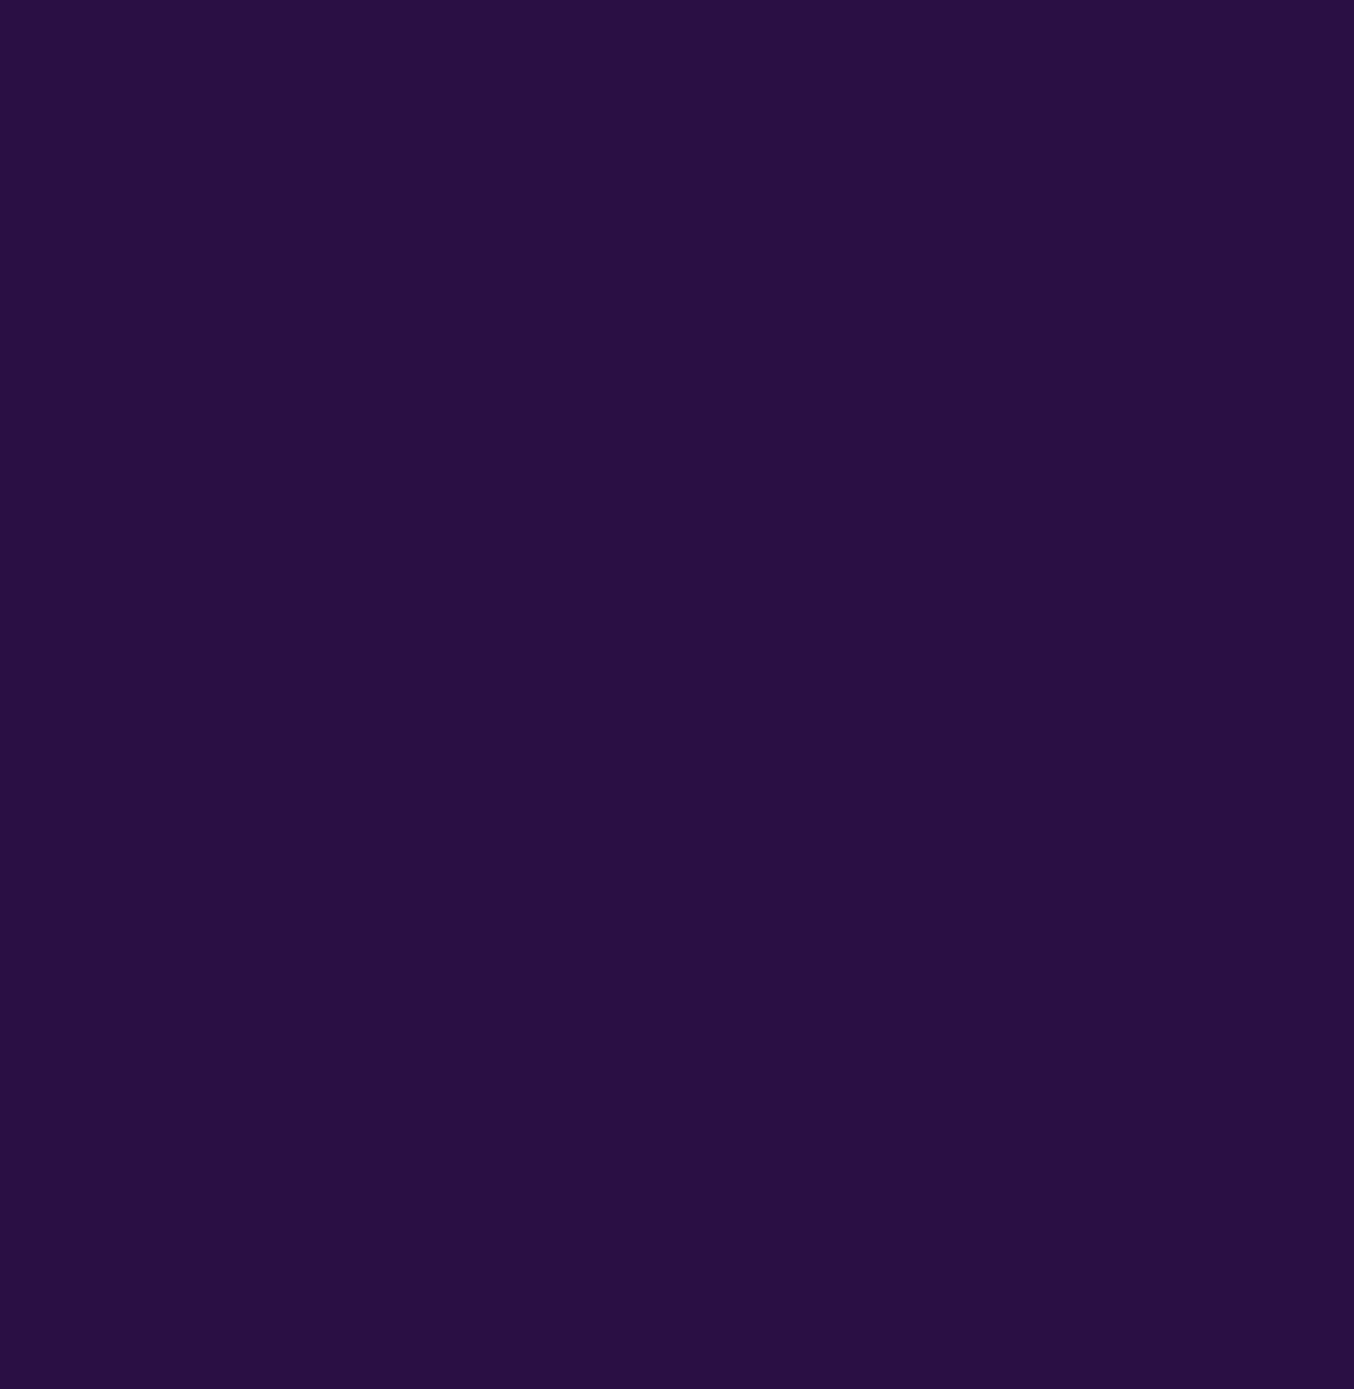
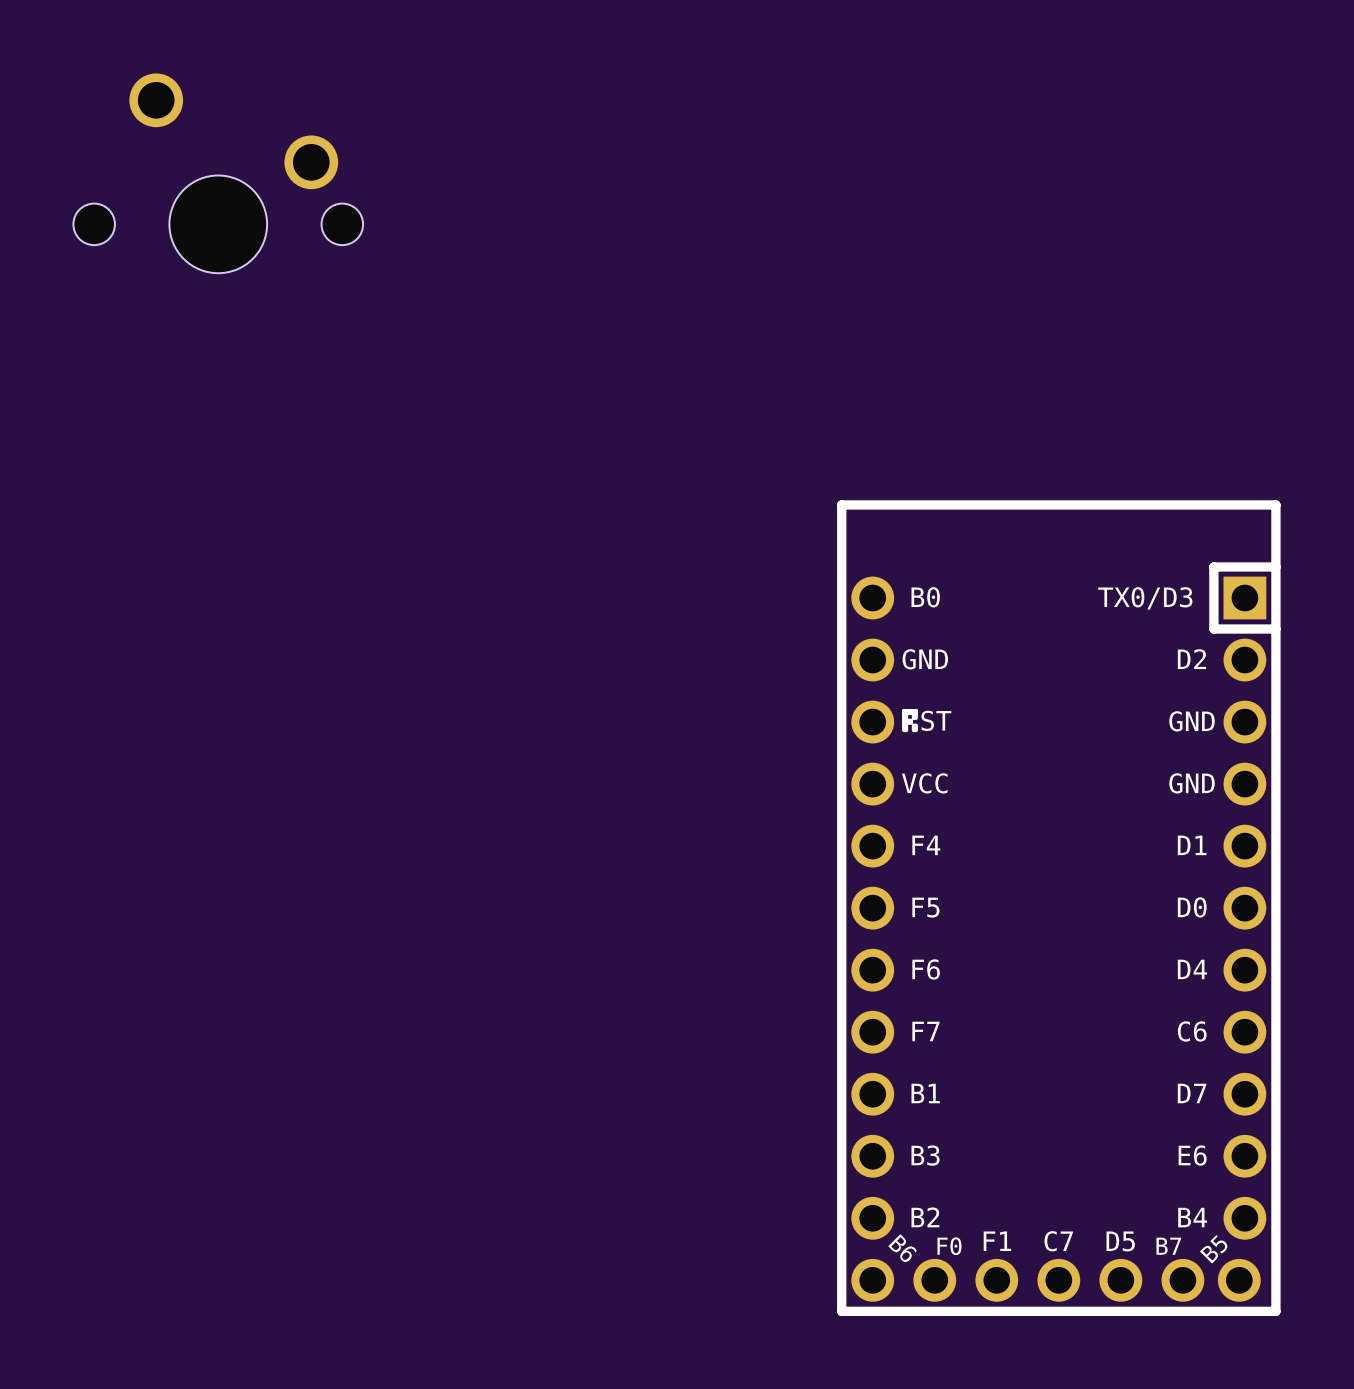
part: none -> (218, 173)
part: none -> (1058, 908)

